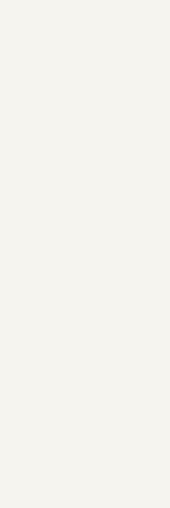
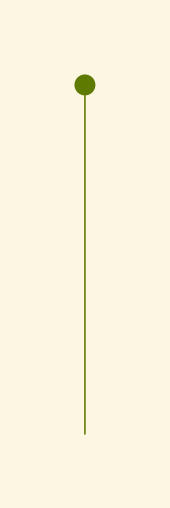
wire: none -> (84, 84) (84, 433)
junction: none -> (84, 84)

